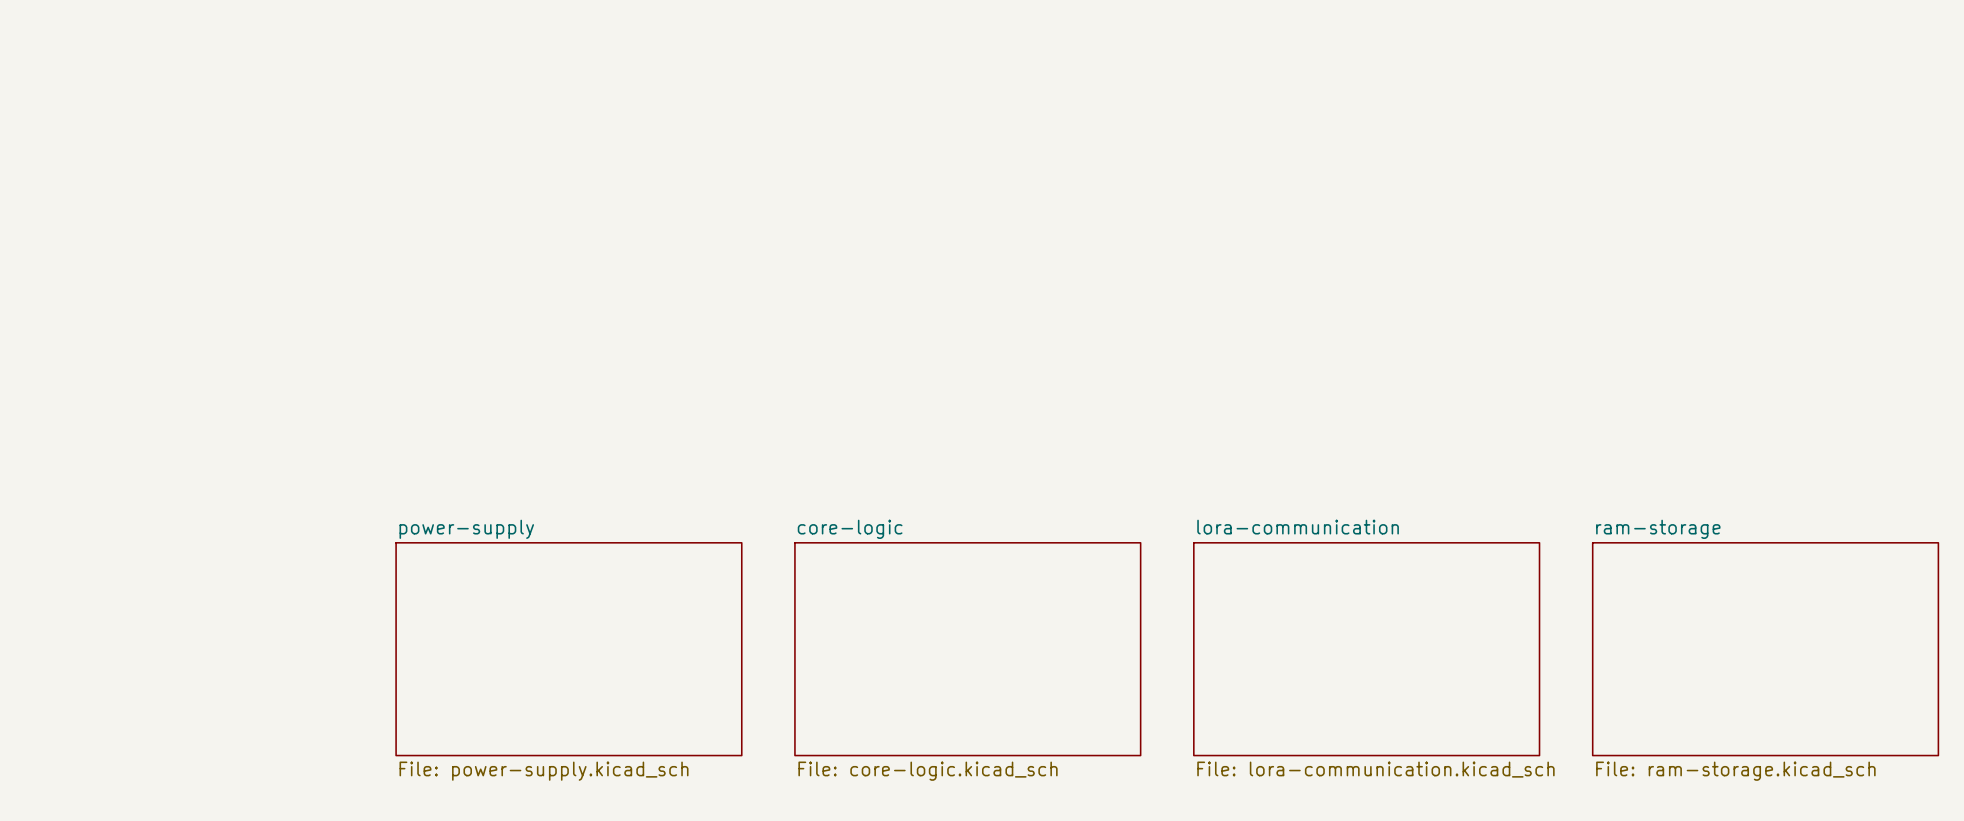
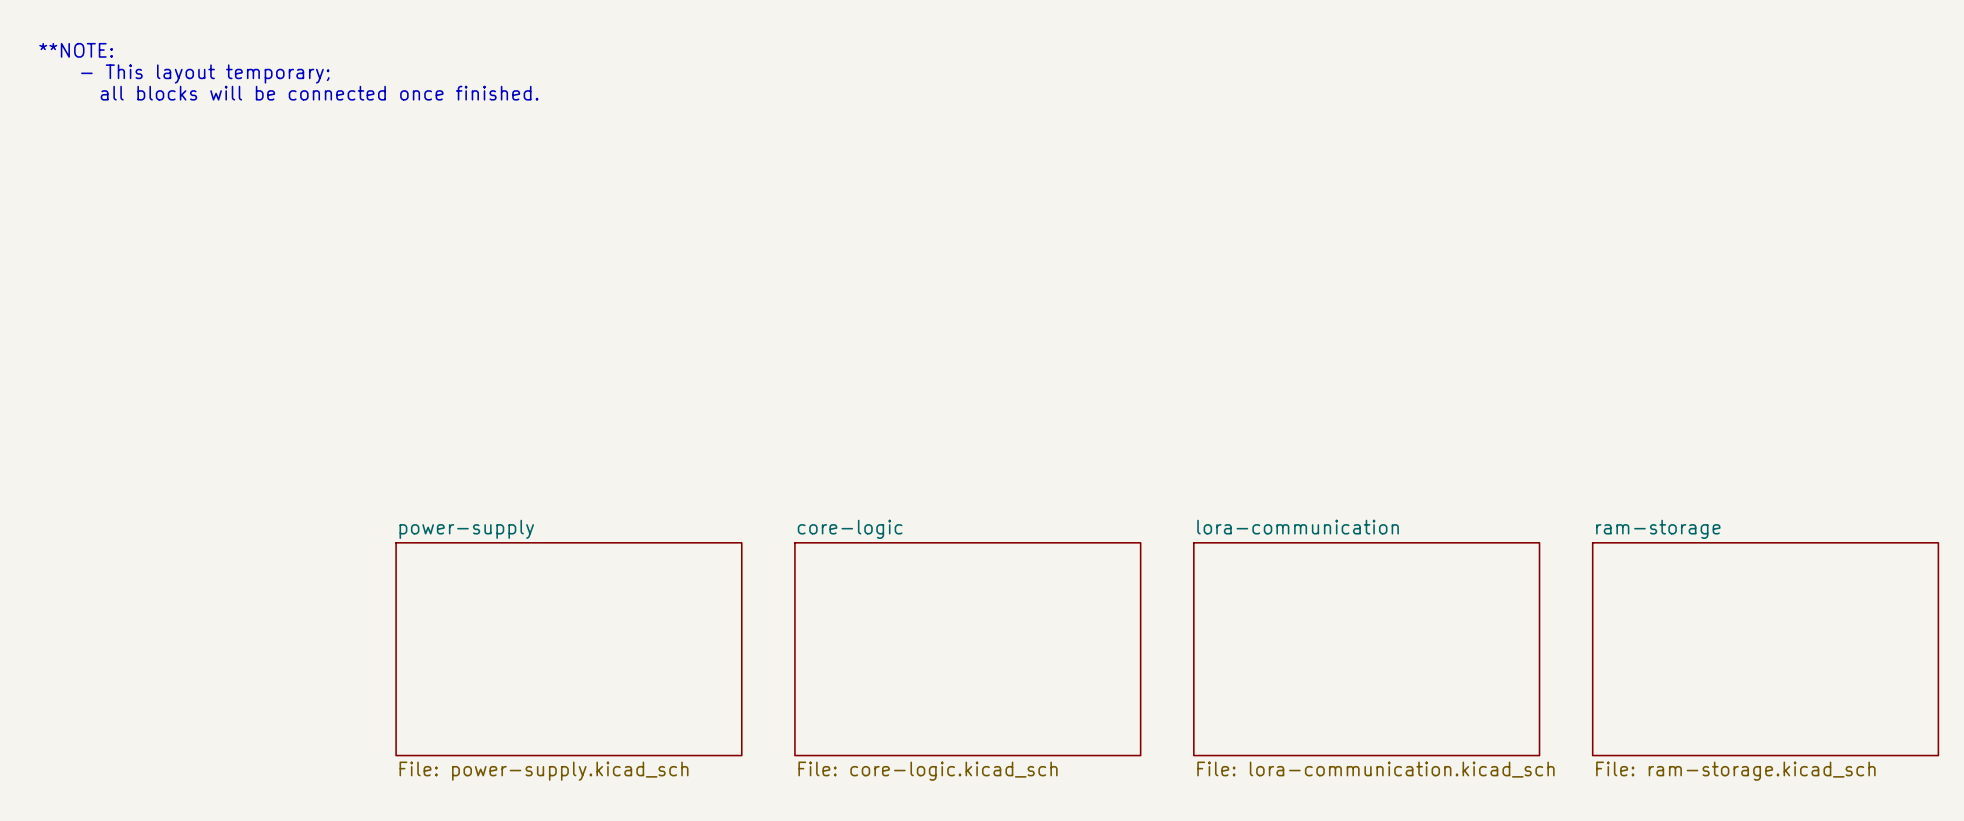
text: none -> **NOTE: (76, 50)
text: none -> - This layout temporary; (205, 73)
text: none -> all blocks will be connected once finished. (319, 93)

